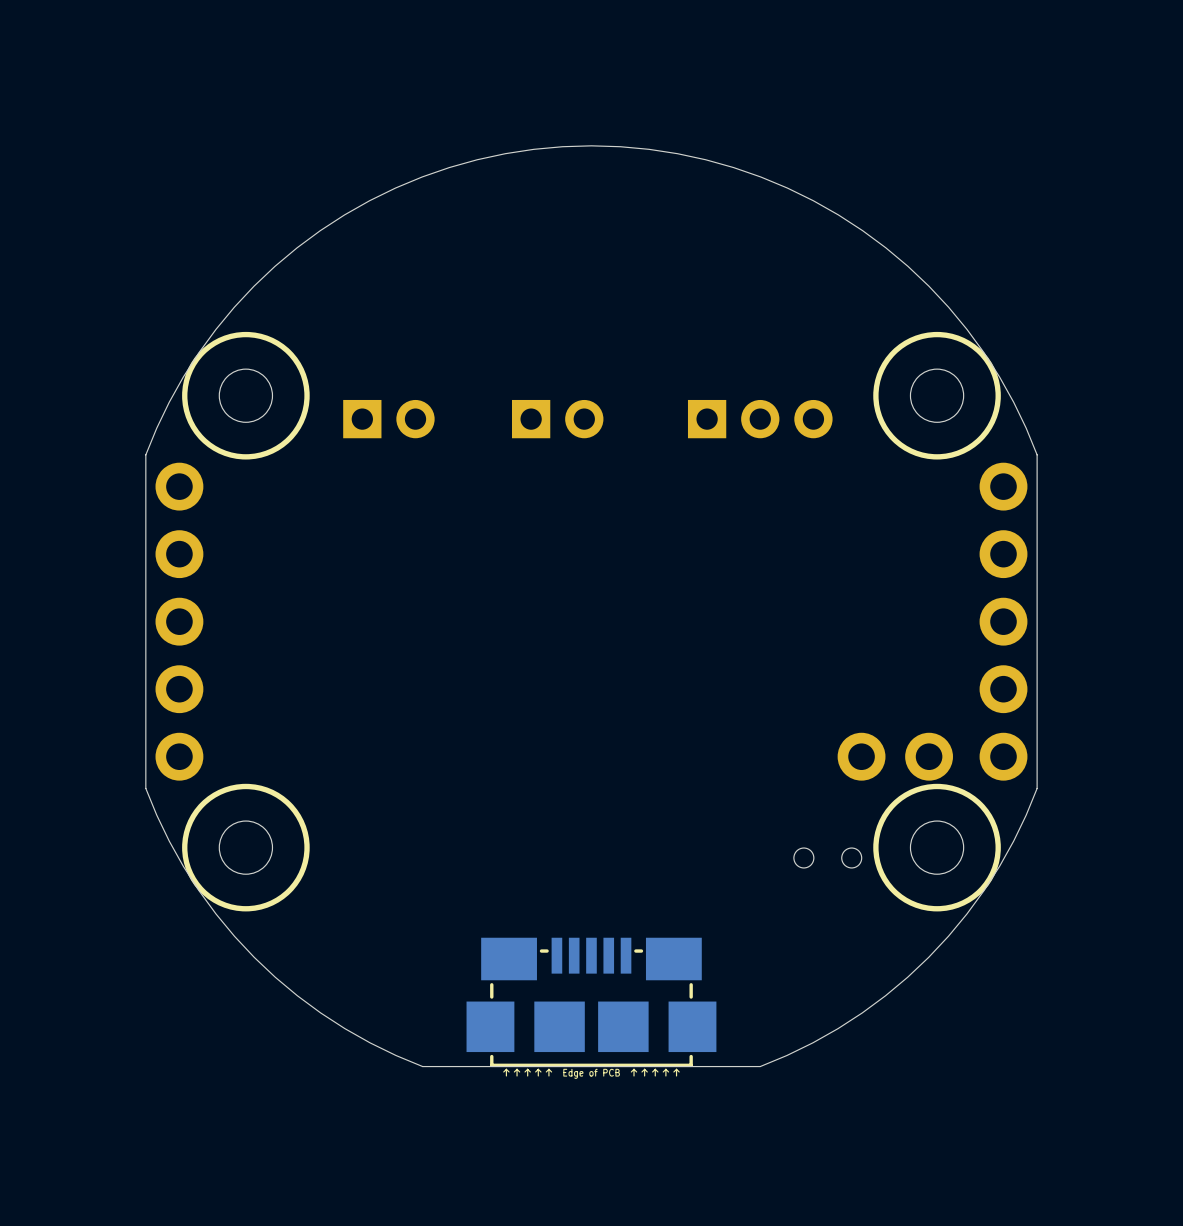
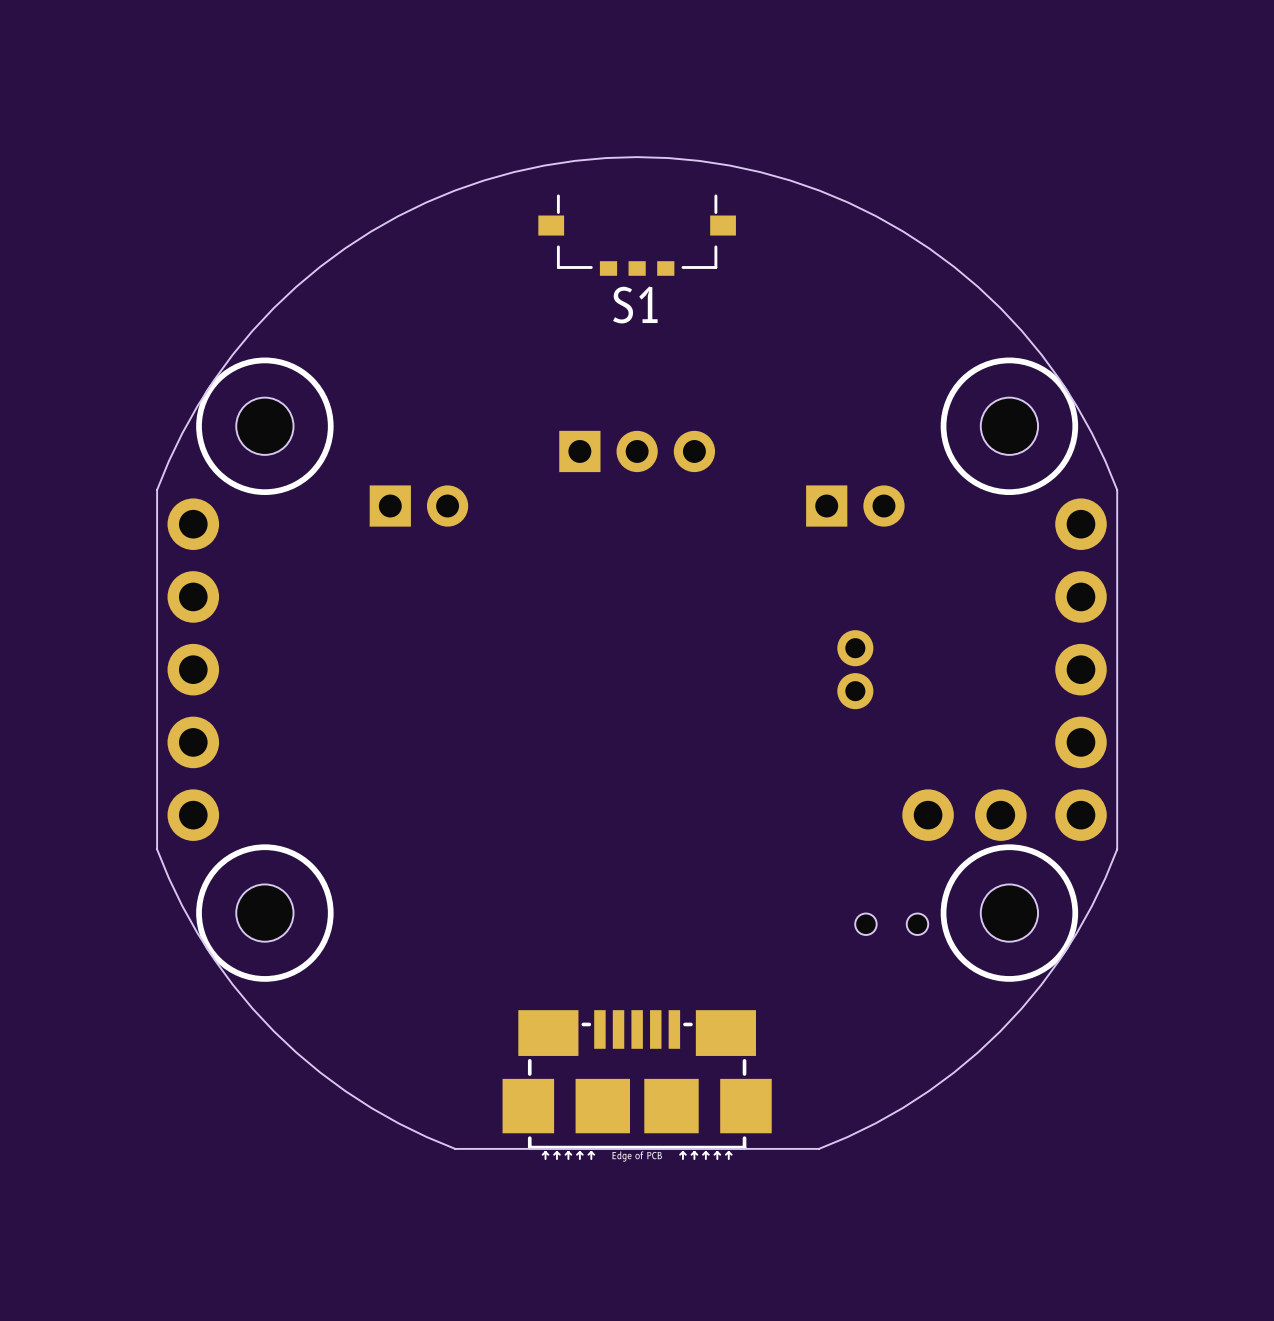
S1: none -> (637, 235)
part position: (388, 419) -> (418, 506)
part: (557, 419) -> none
part position: (760, 419) -> (637, 451)
part: none -> (855, 506)
part: none -> (855, 669)

